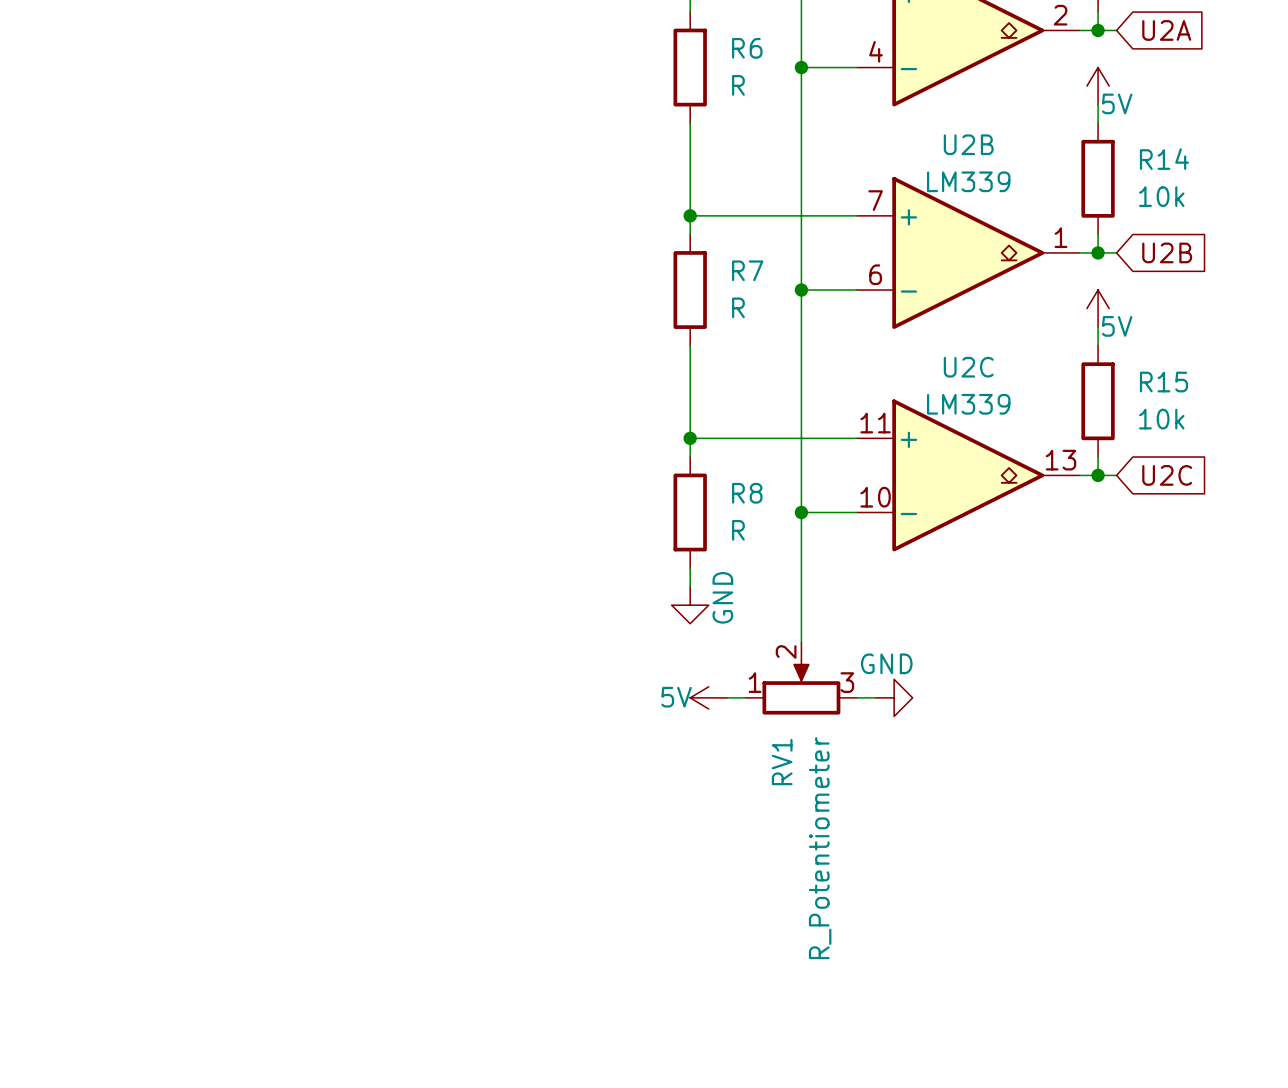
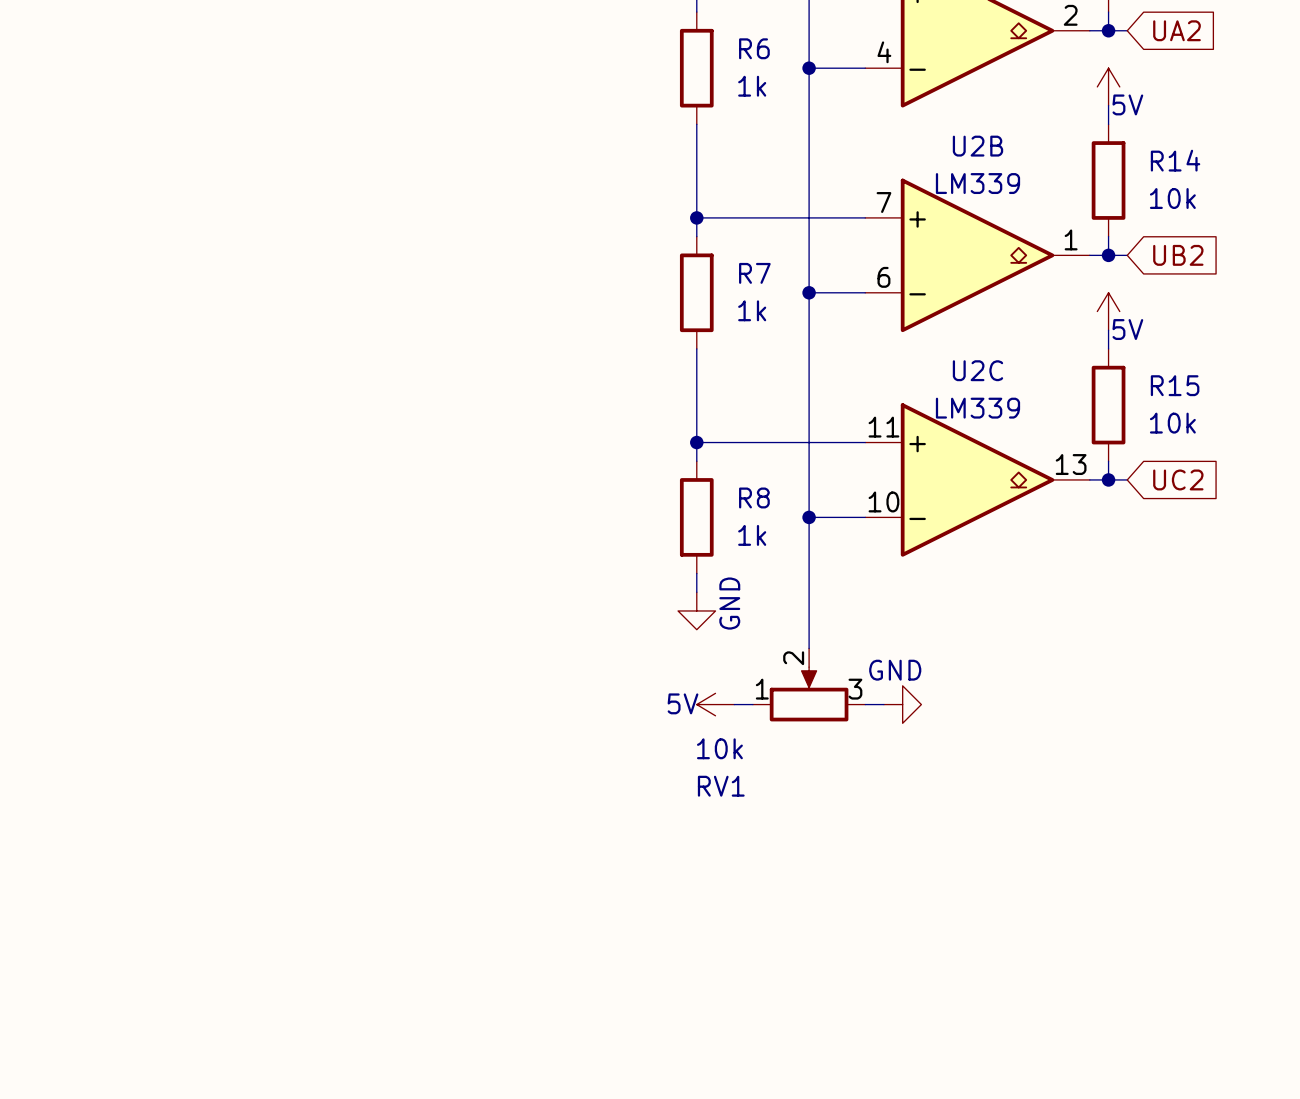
global label: U2A (1166, 30) -> UA2 (1176, 30)
R6 value: R (738, 85) -> 1k (752, 86)
global label: U2B (1167, 252) -> UB2 (1178, 255)
R7 value: R (738, 307) -> 1k (752, 310)
global label: U2C (1167, 475) -> UC2 (1178, 479)
R8 value: R (738, 530) -> 1k (752, 535)
RV1 name rotation: 0° (782, 762) -> 90° clockwise (721, 786)
RV1 name position: RV1 (782, 762) -> RV1 (721, 786)
RV1 value: R_Potentiometer (820, 848) -> 10k (719, 748)

